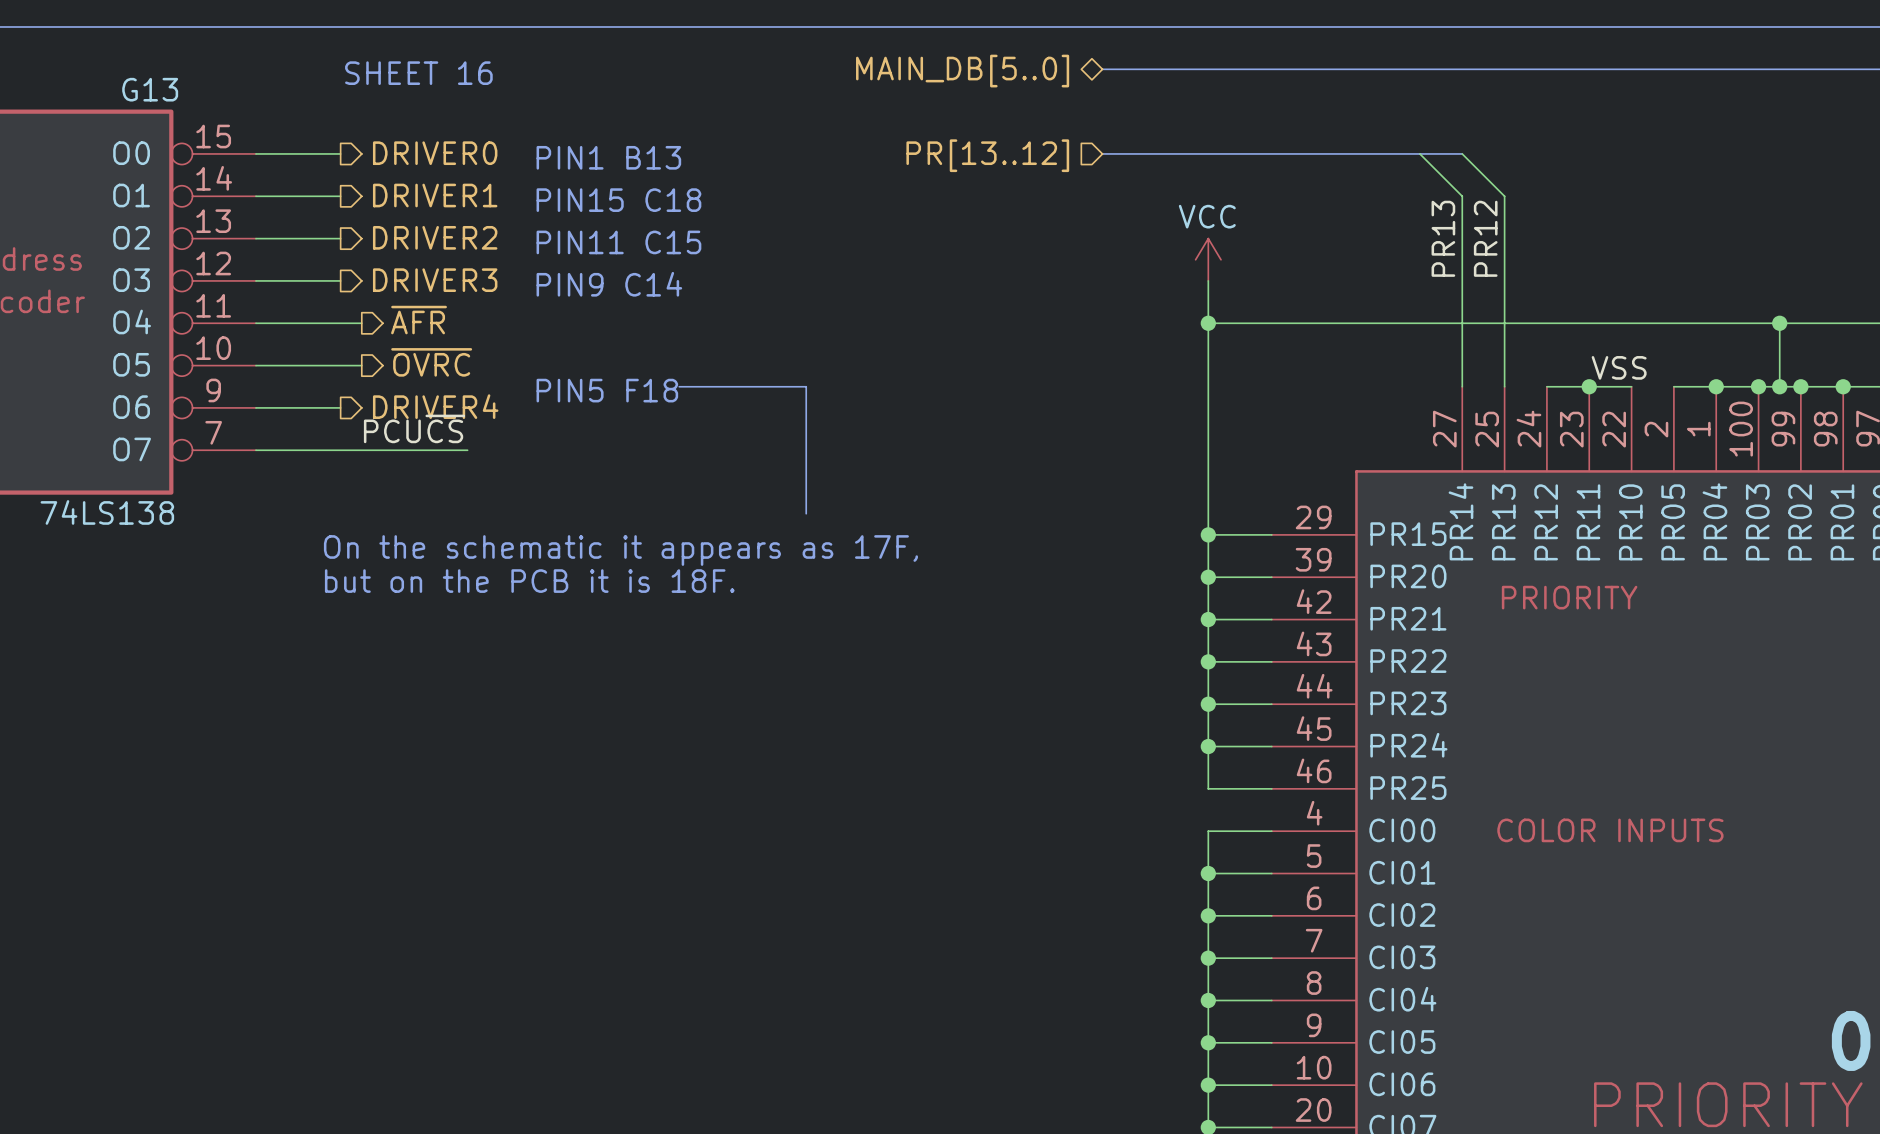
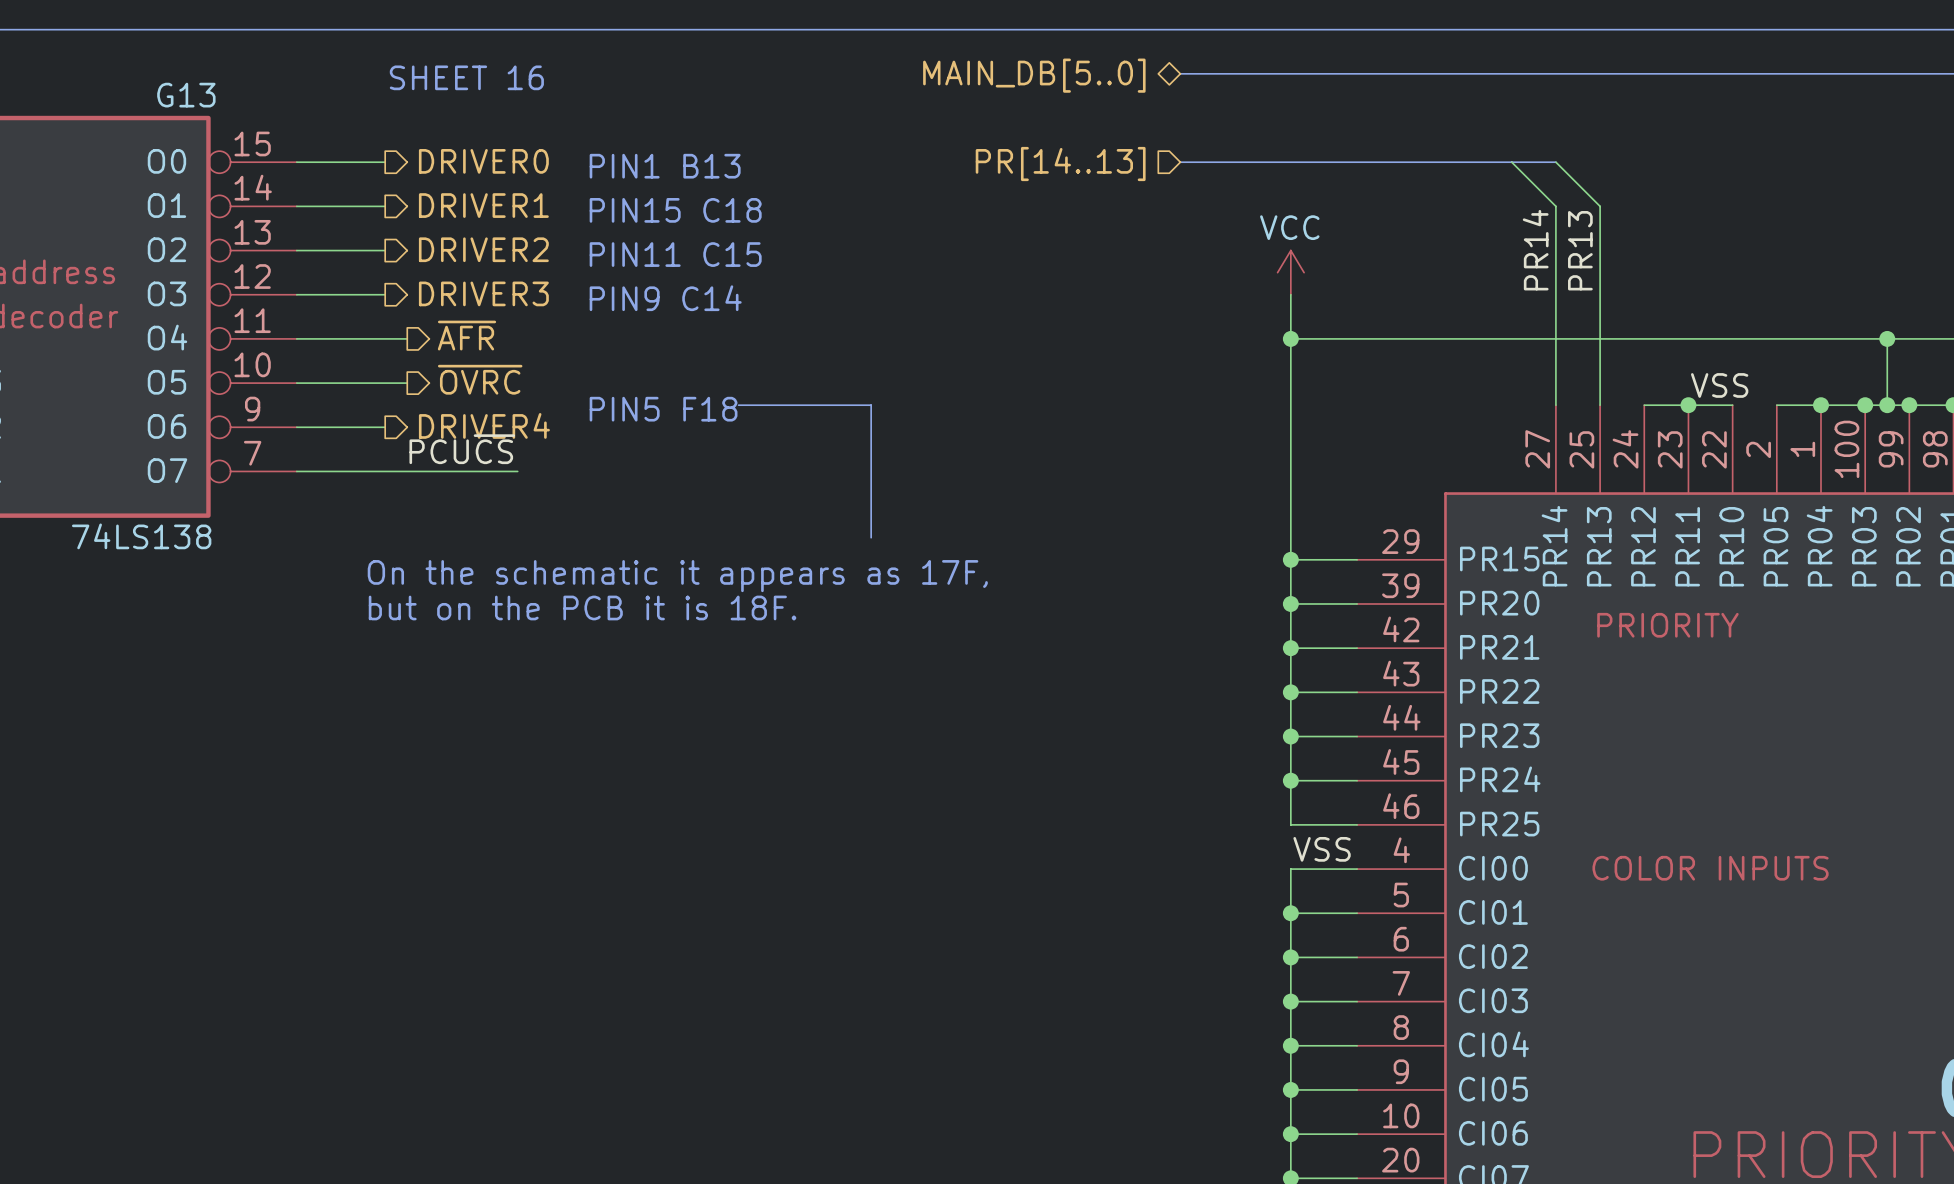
hierarchical label: PR[13..12] (987, 155) -> PR[14..13] (1060, 164)
label: PR13 (1443, 238) -> PR14 (1535, 250)
label: PR12 (1485, 238) -> PR13 (1580, 250)
label: none -> VSS (1322, 849)

